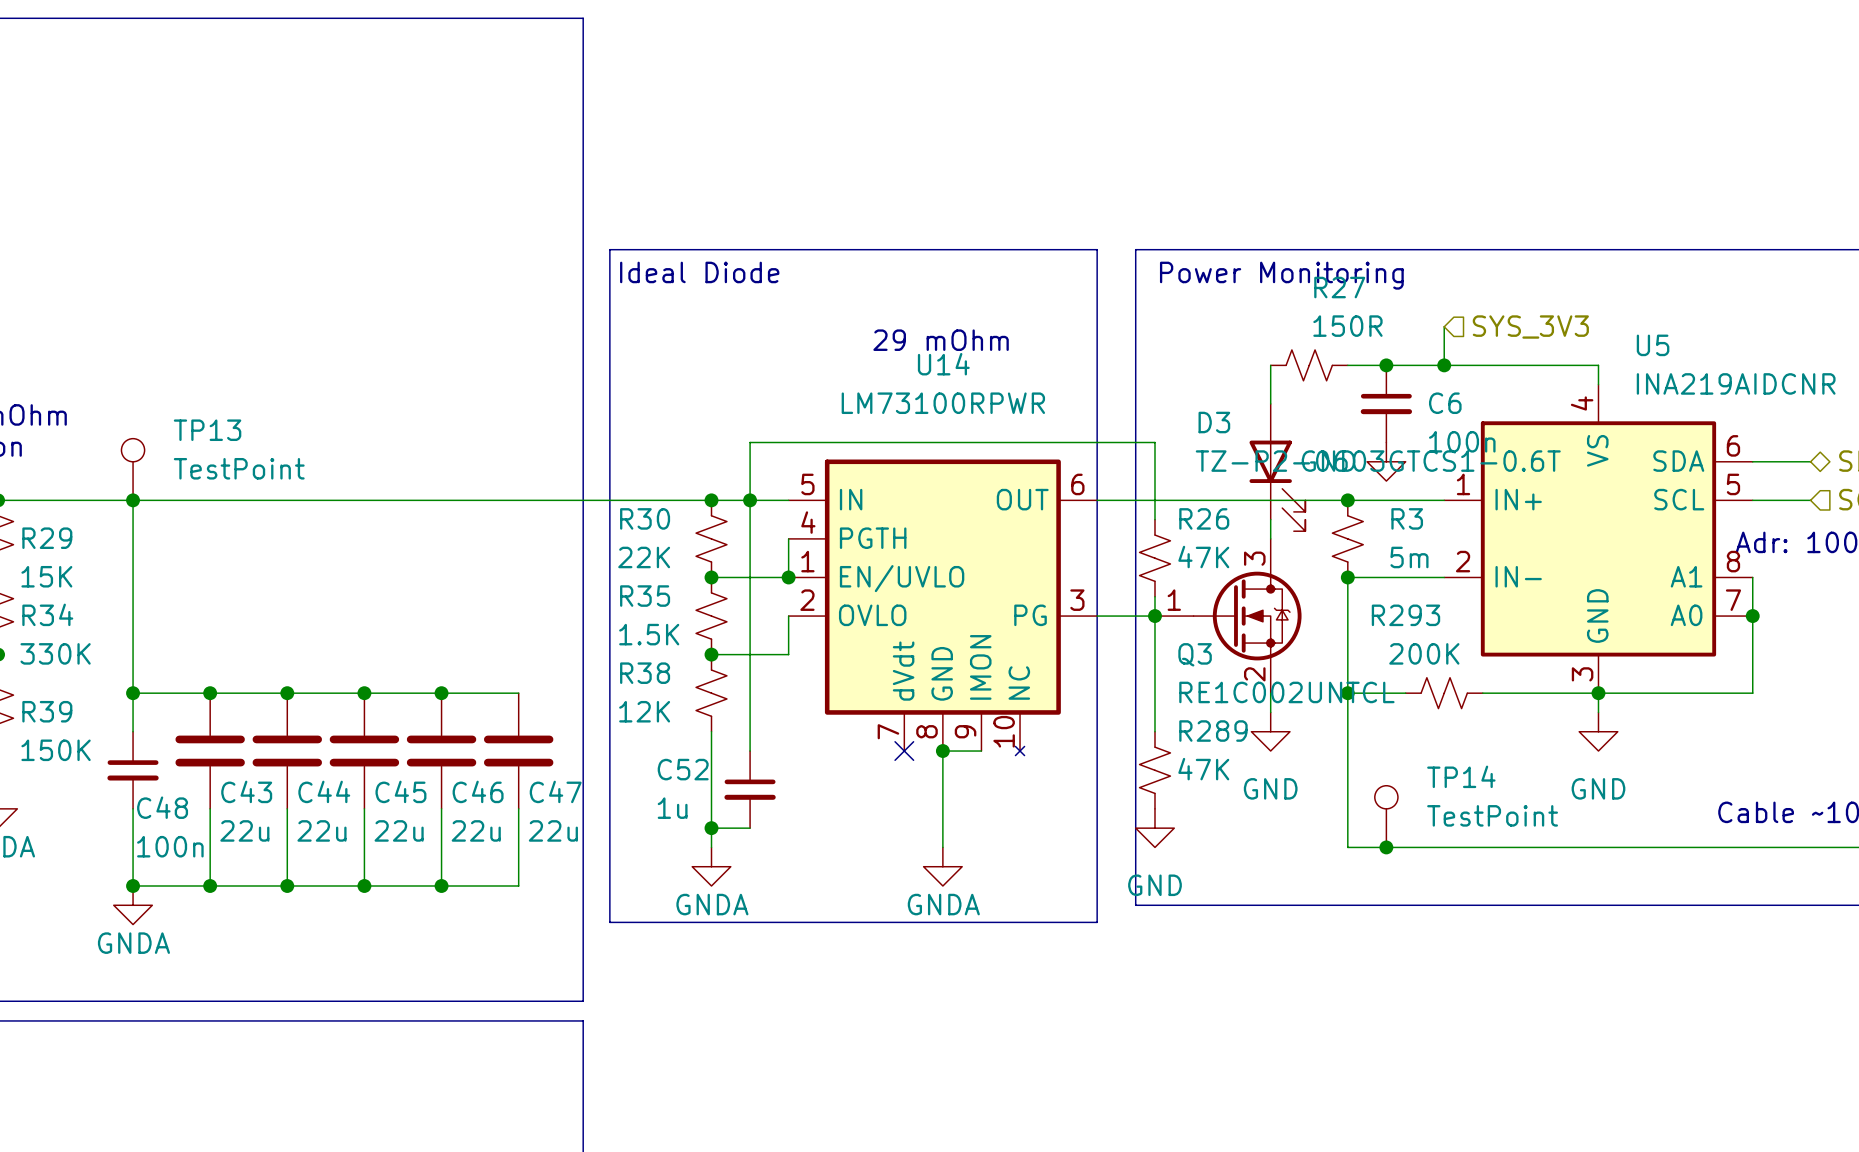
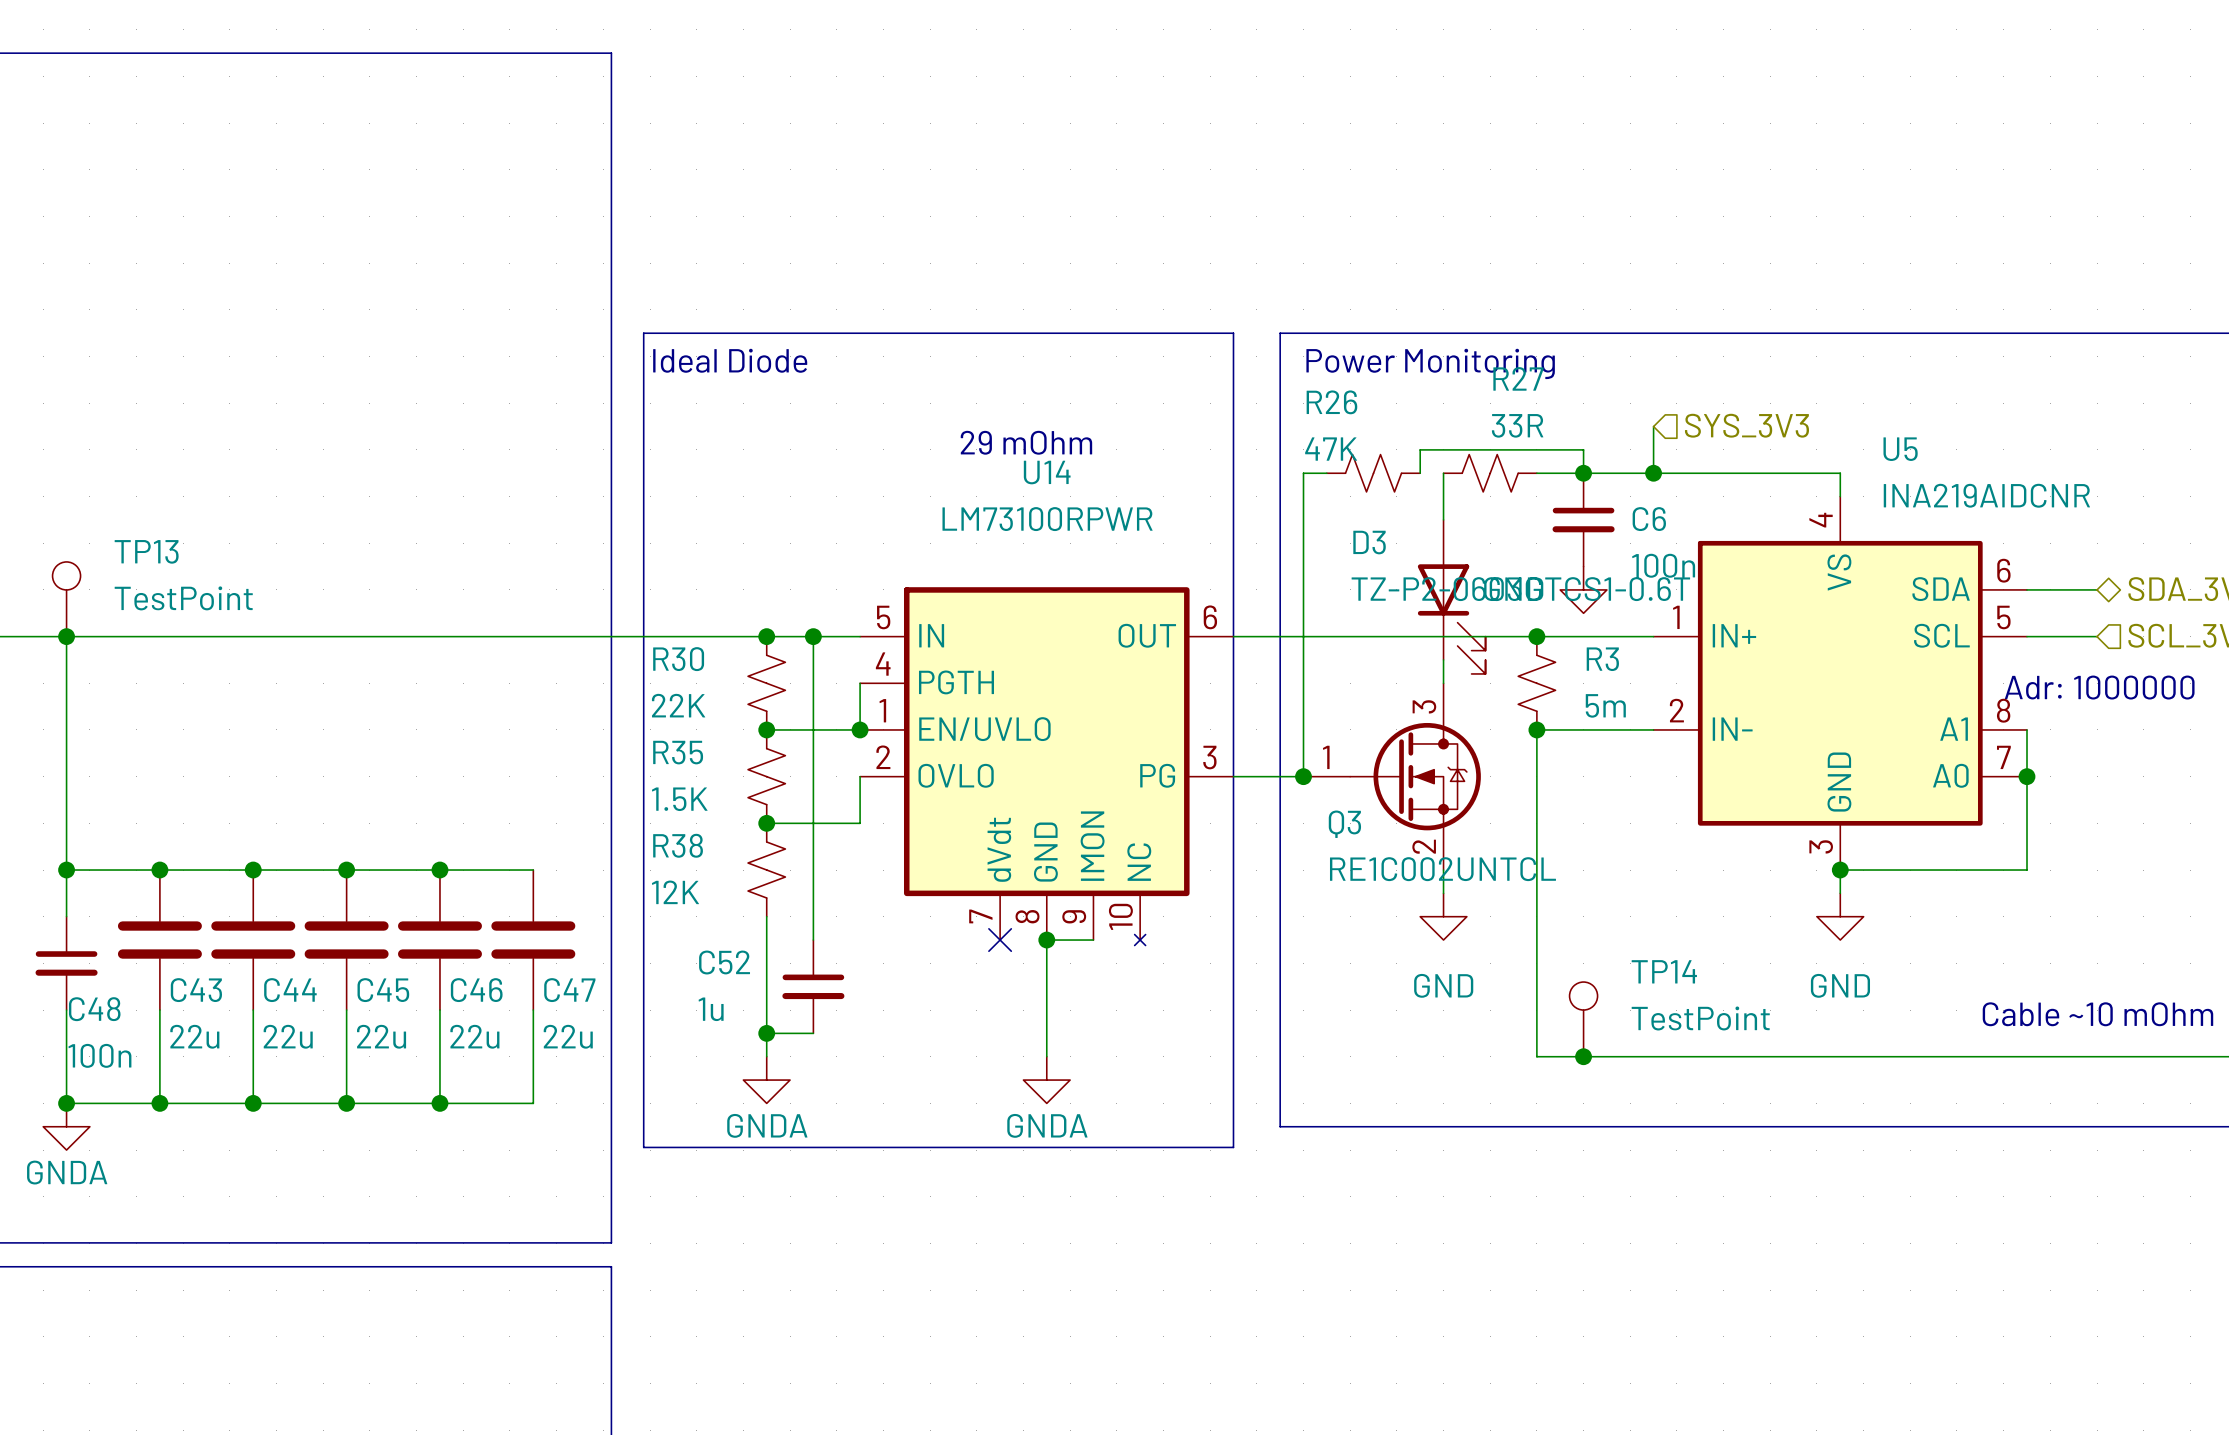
R27 value: 150R (1347, 326) -> 33R (1517, 425)
wire: none -> (1420, 473) (1420, 449) (1583, 449) (1583, 473)
wire: (1154, 442) (750, 442) (750, 500) -> (1303, 566) (1303, 473) (1326, 473)
R26 name position: R26 (1204, 518) -> R26 (1331, 402)
wire: none -> (1303, 659) (1303, 753)
R26 value position: 47K (1203, 557) -> 47K (1331, 449)
R26 rotation: 0° (1154, 558) -> 90° clockwise (1373, 473)
R26 position: (1154, 558) -> (1373, 473)
wire: (1154, 616) (1154, 731) -> none
wire: (1347, 693) (1405, 693) -> none
junction: (1347, 693) -> none
R293: 200K (1444, 693) -> none
wire: (1482, 693) (1598, 693) -> none
R289: 47K (1154, 770) -> none
power symbol: GND (1154, 828) -> none

